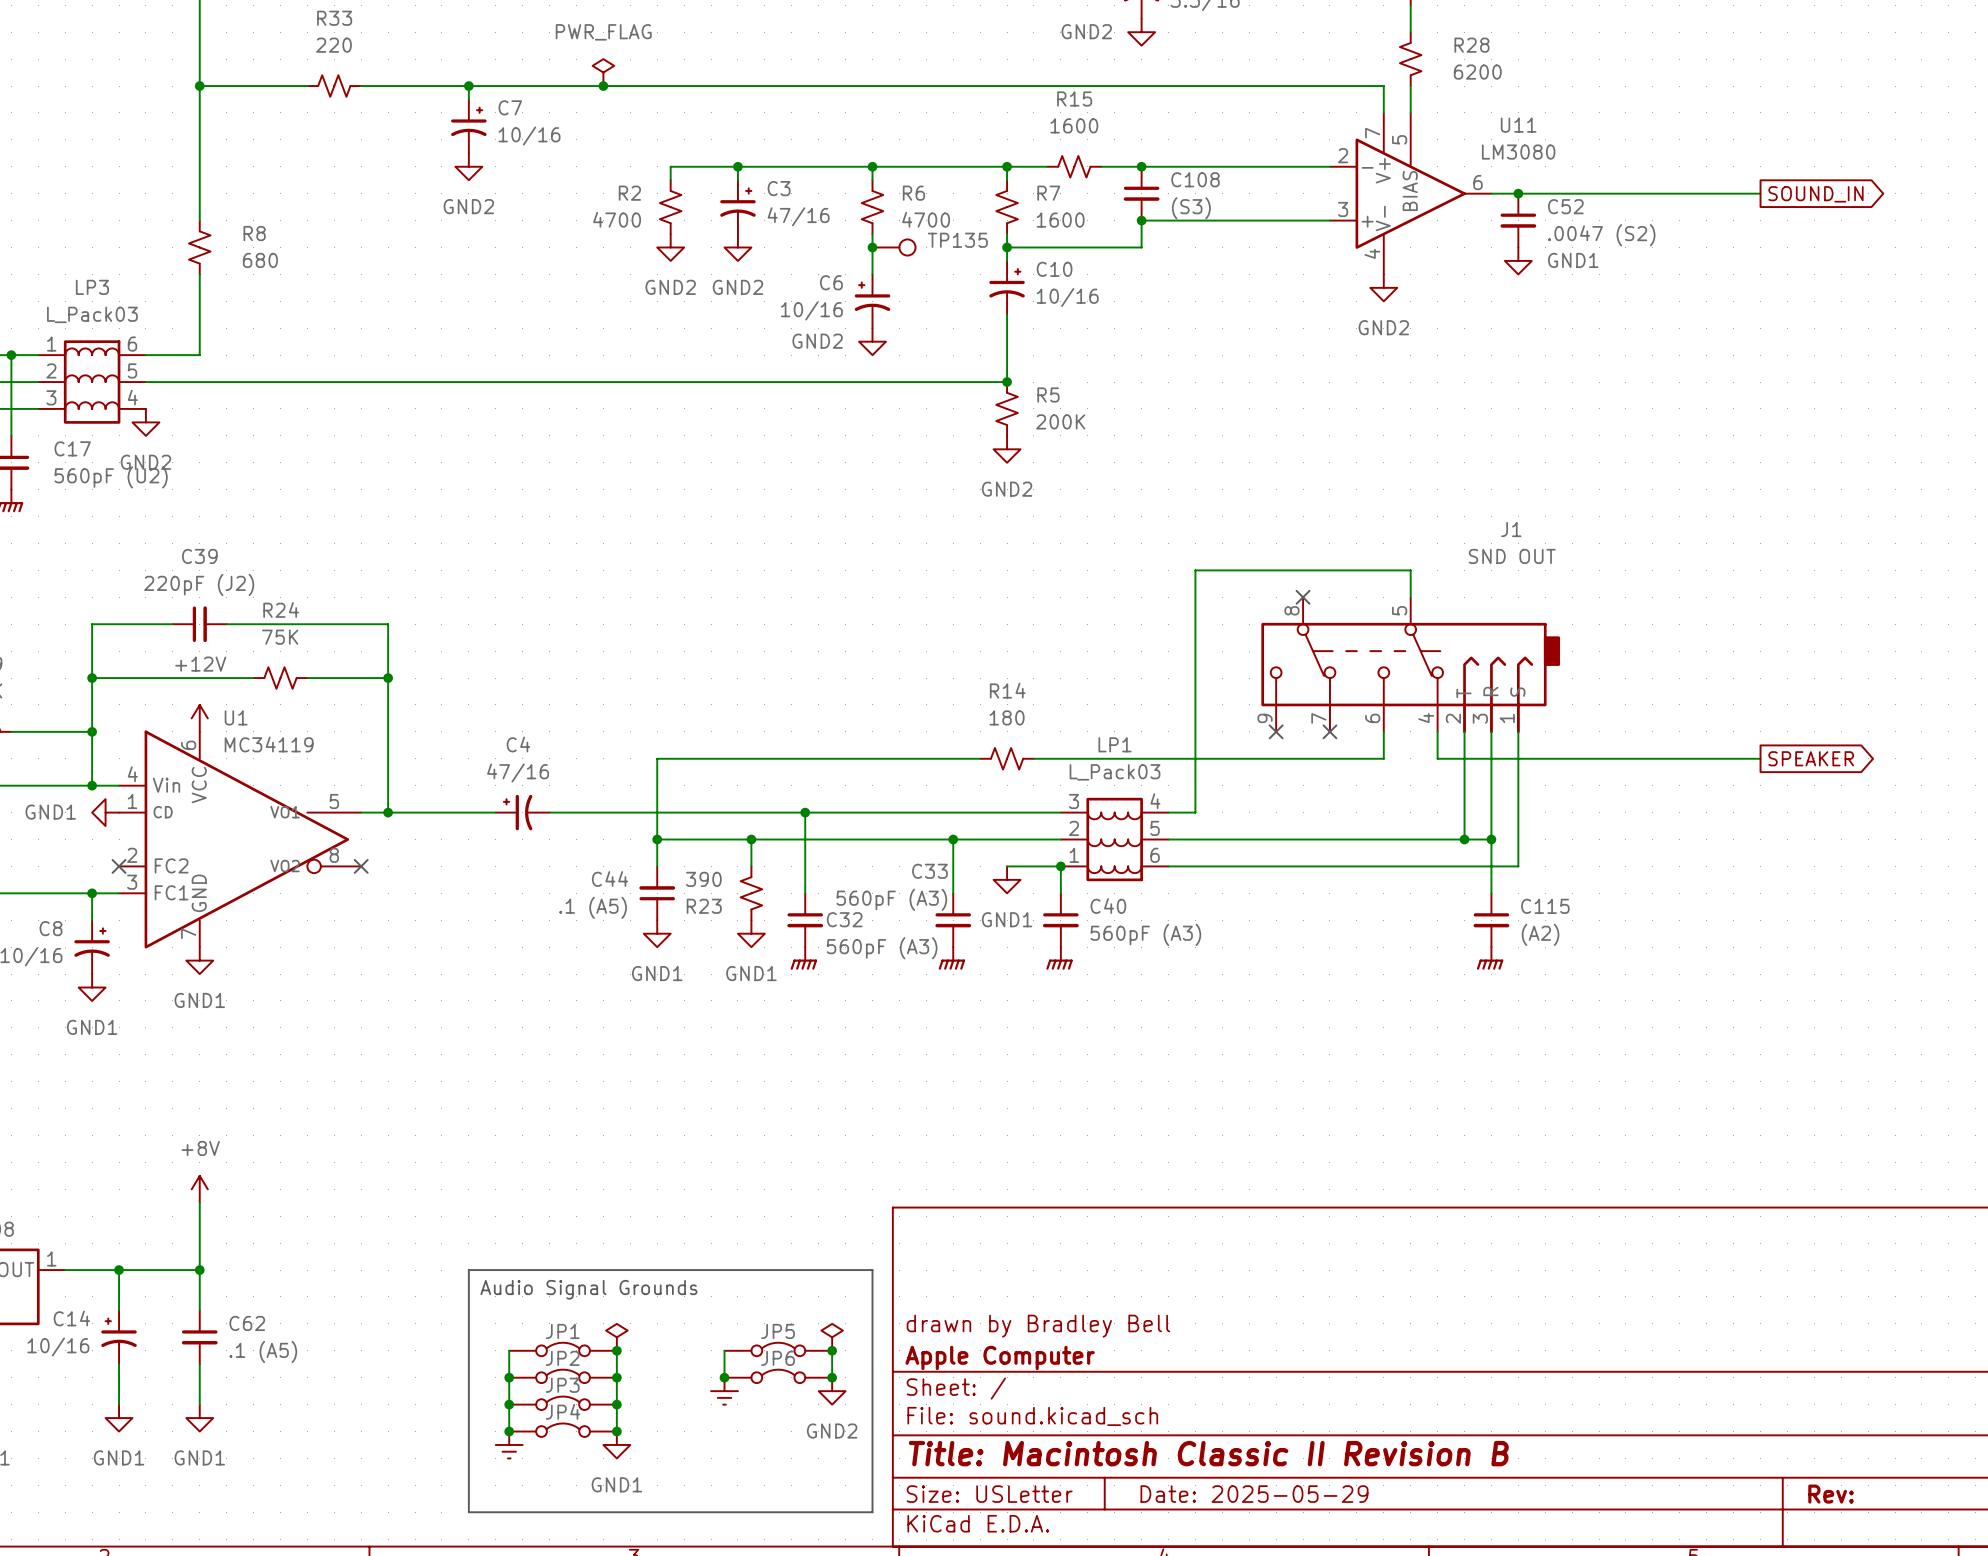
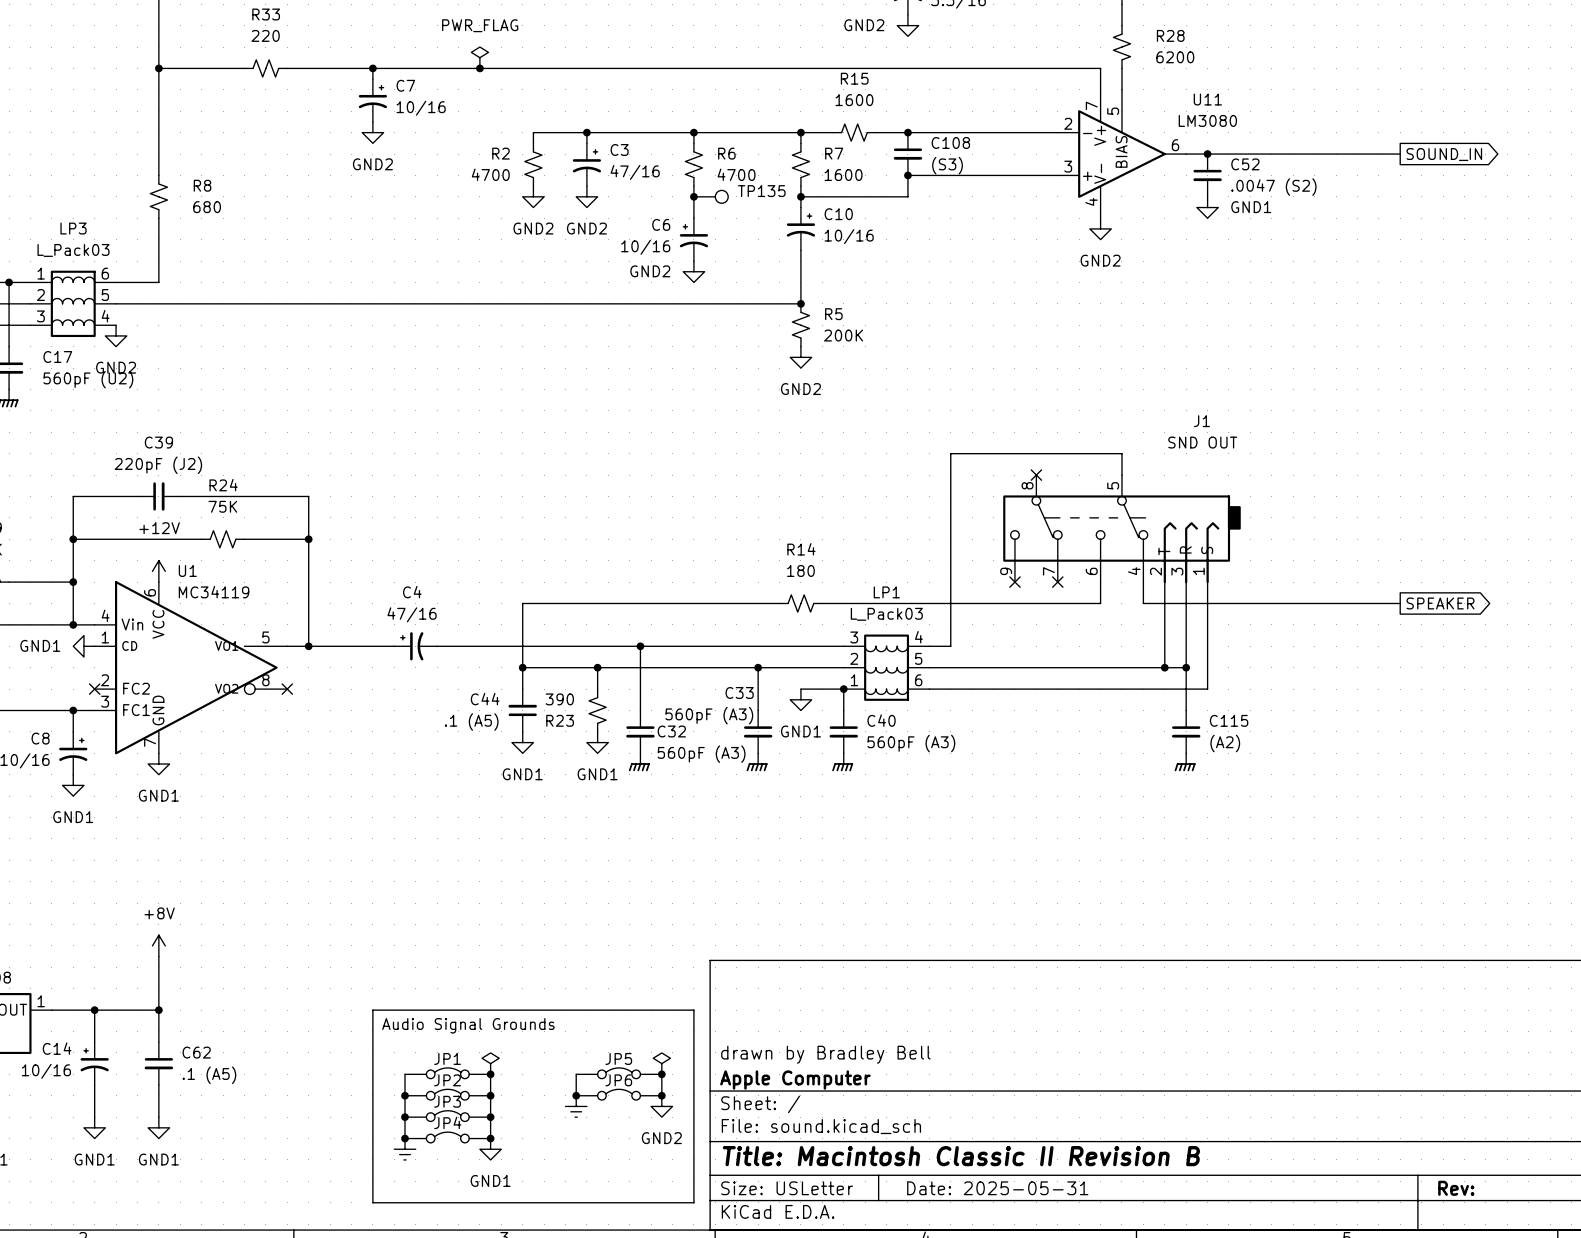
title block: Date: 2025-05-29 (1254, 1494) -> Date: 2025-05-31 (997, 1188)

